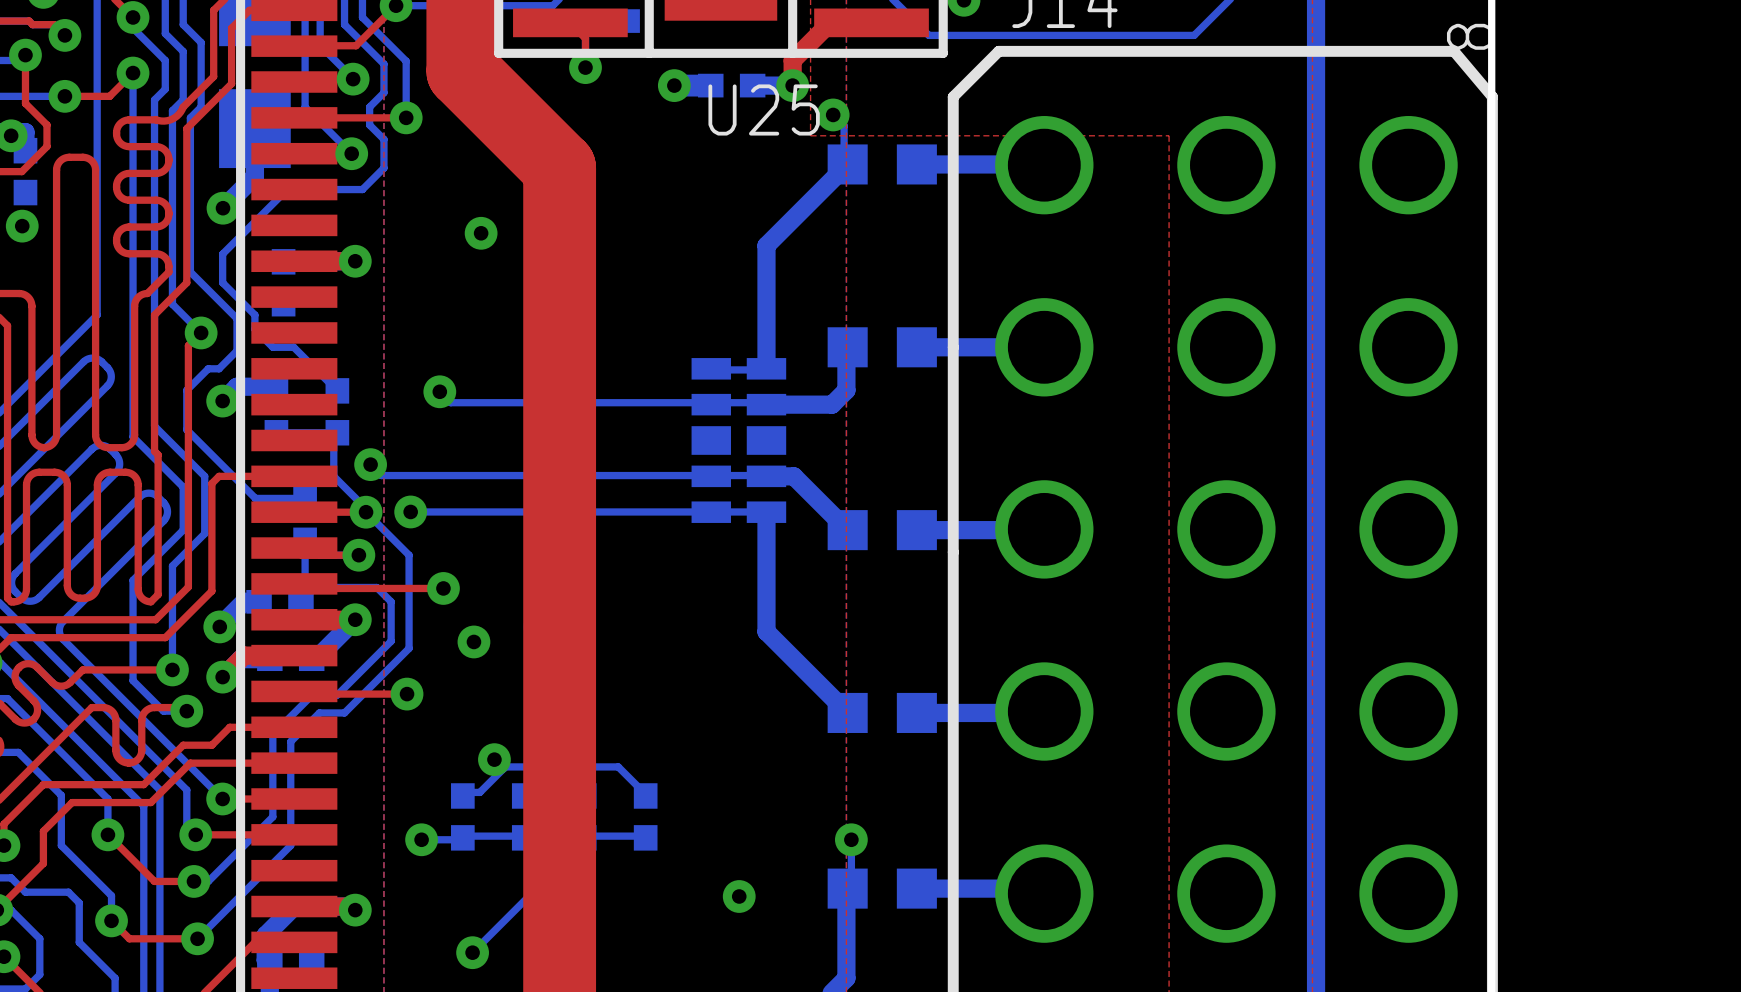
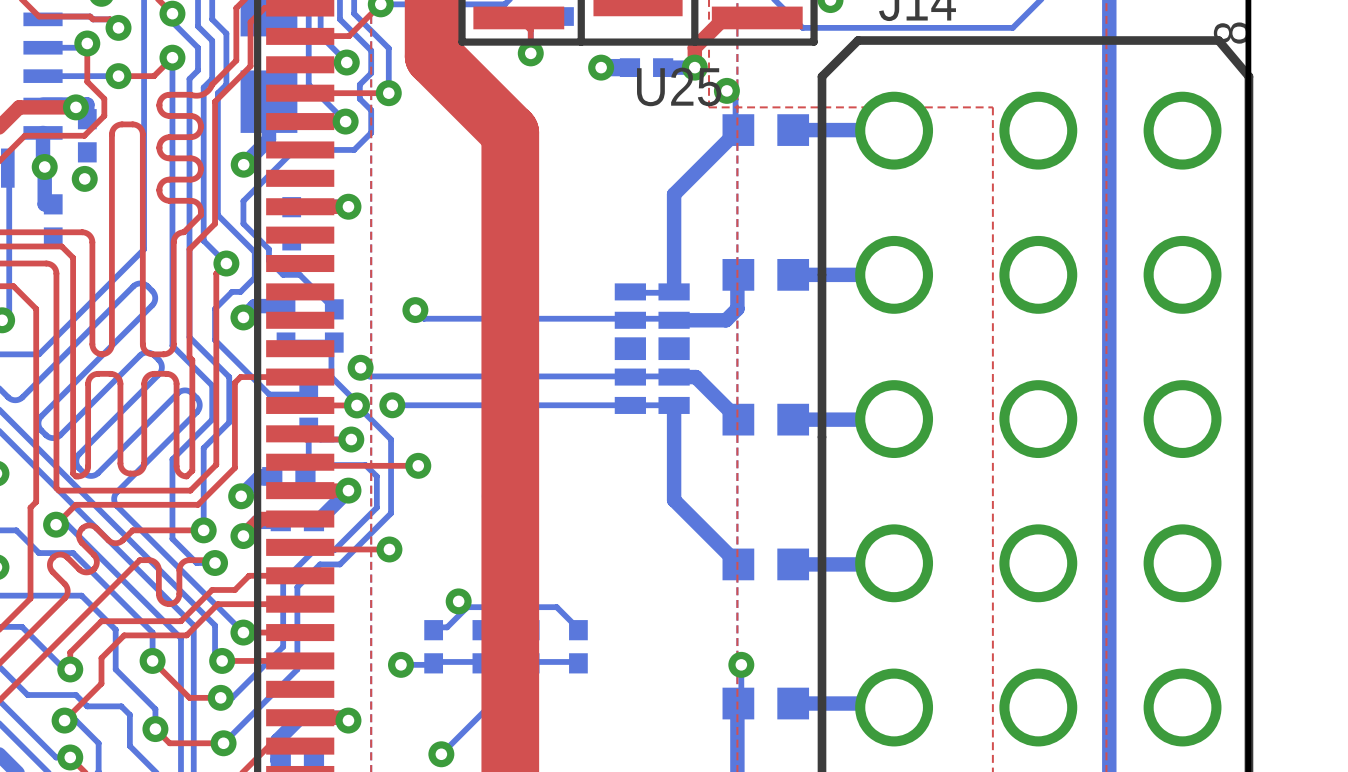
via: (481, 233) -> none
via: (473, 641) -> none
via: (739, 896) -> none

